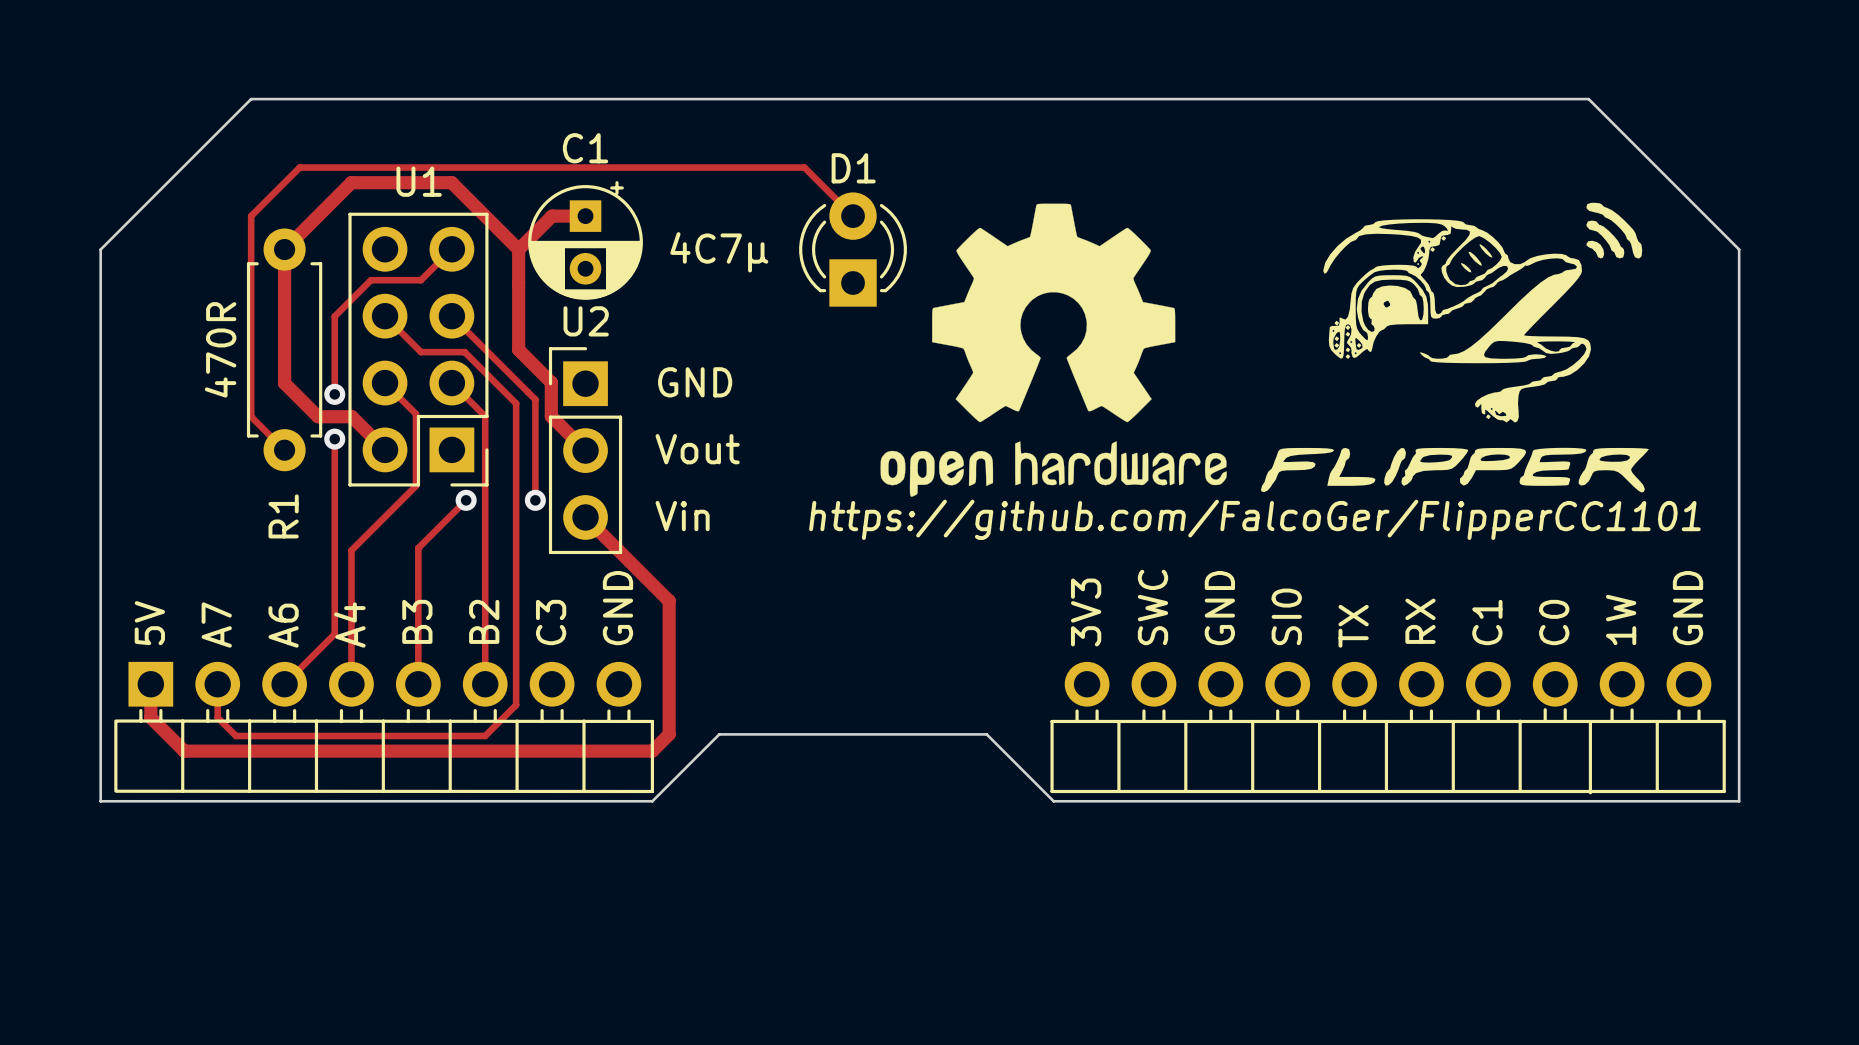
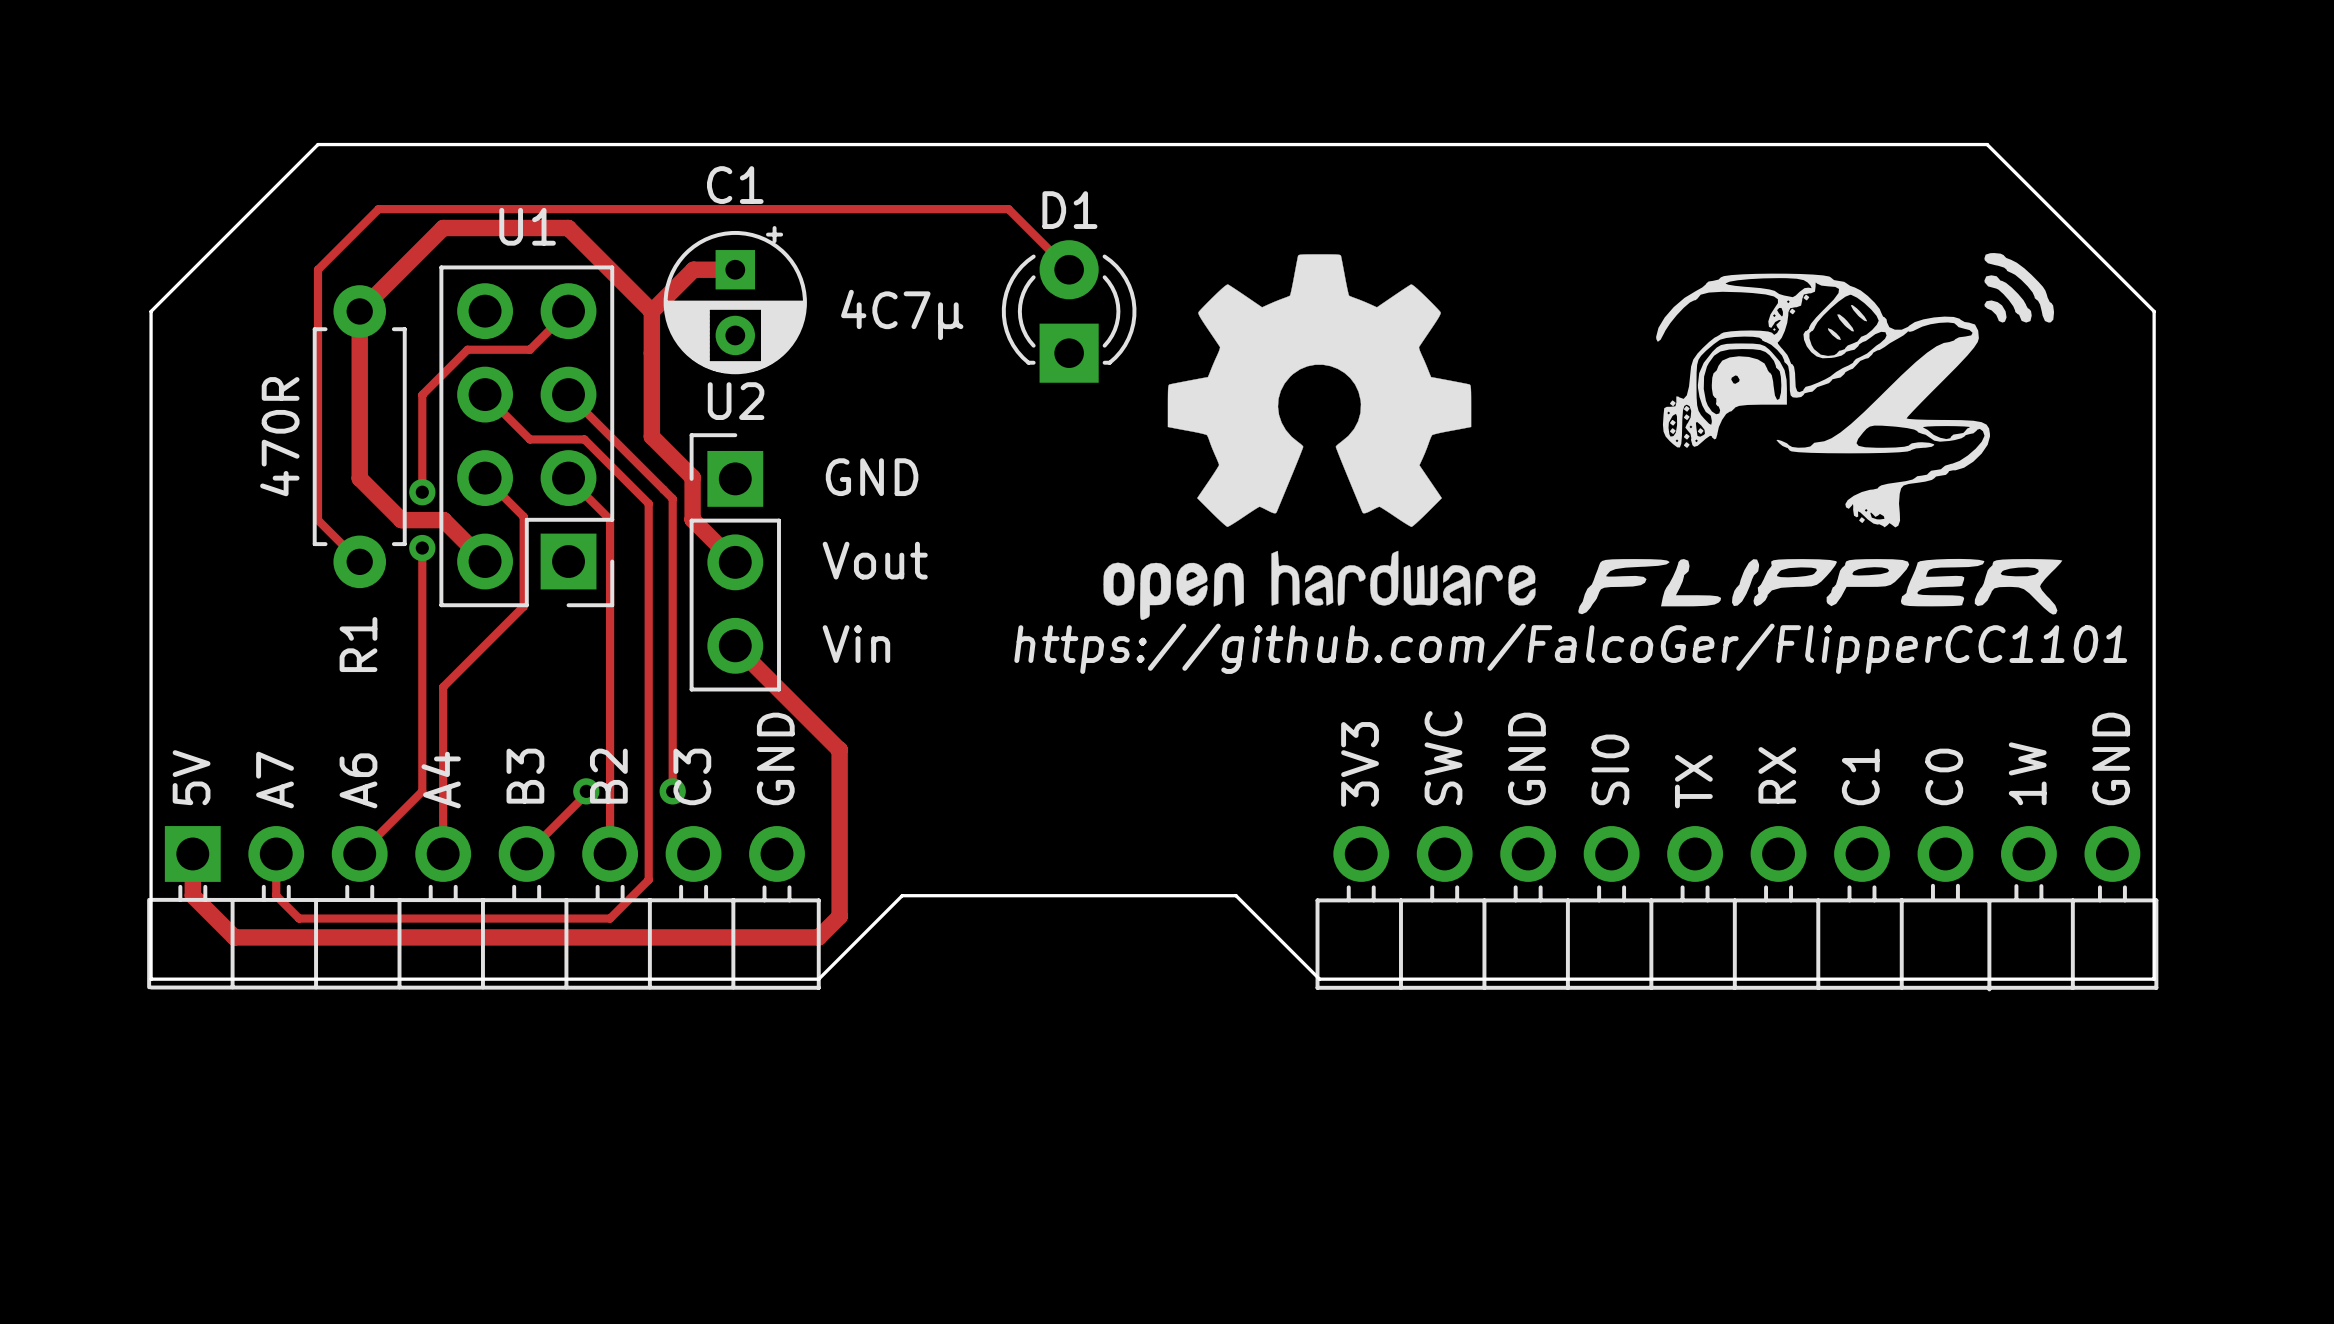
board edge: (251, 99) (100, 249) (100, 801) (652, 801) (719, 734) (986, 734) (1053, 801) (1739, 801) (1739, 249) (1588, 99) (251, 99) -> (317, 144) (151, 311) (151, 979) (818, 979) (902, 895) (1236, 895) (1319, 979) (2154, 979) (2154, 311) (1987, 144) (317, 144)
track: (466, 500) (418, 548) (418, 684) -> (586, 791) (586, 794) (526, 853)
via: (466, 500) -> none
track: none -> (672, 624) (672, 791)
via: (535, 500) -> none
via: none -> (586, 791)
via: none -> (672, 791)

